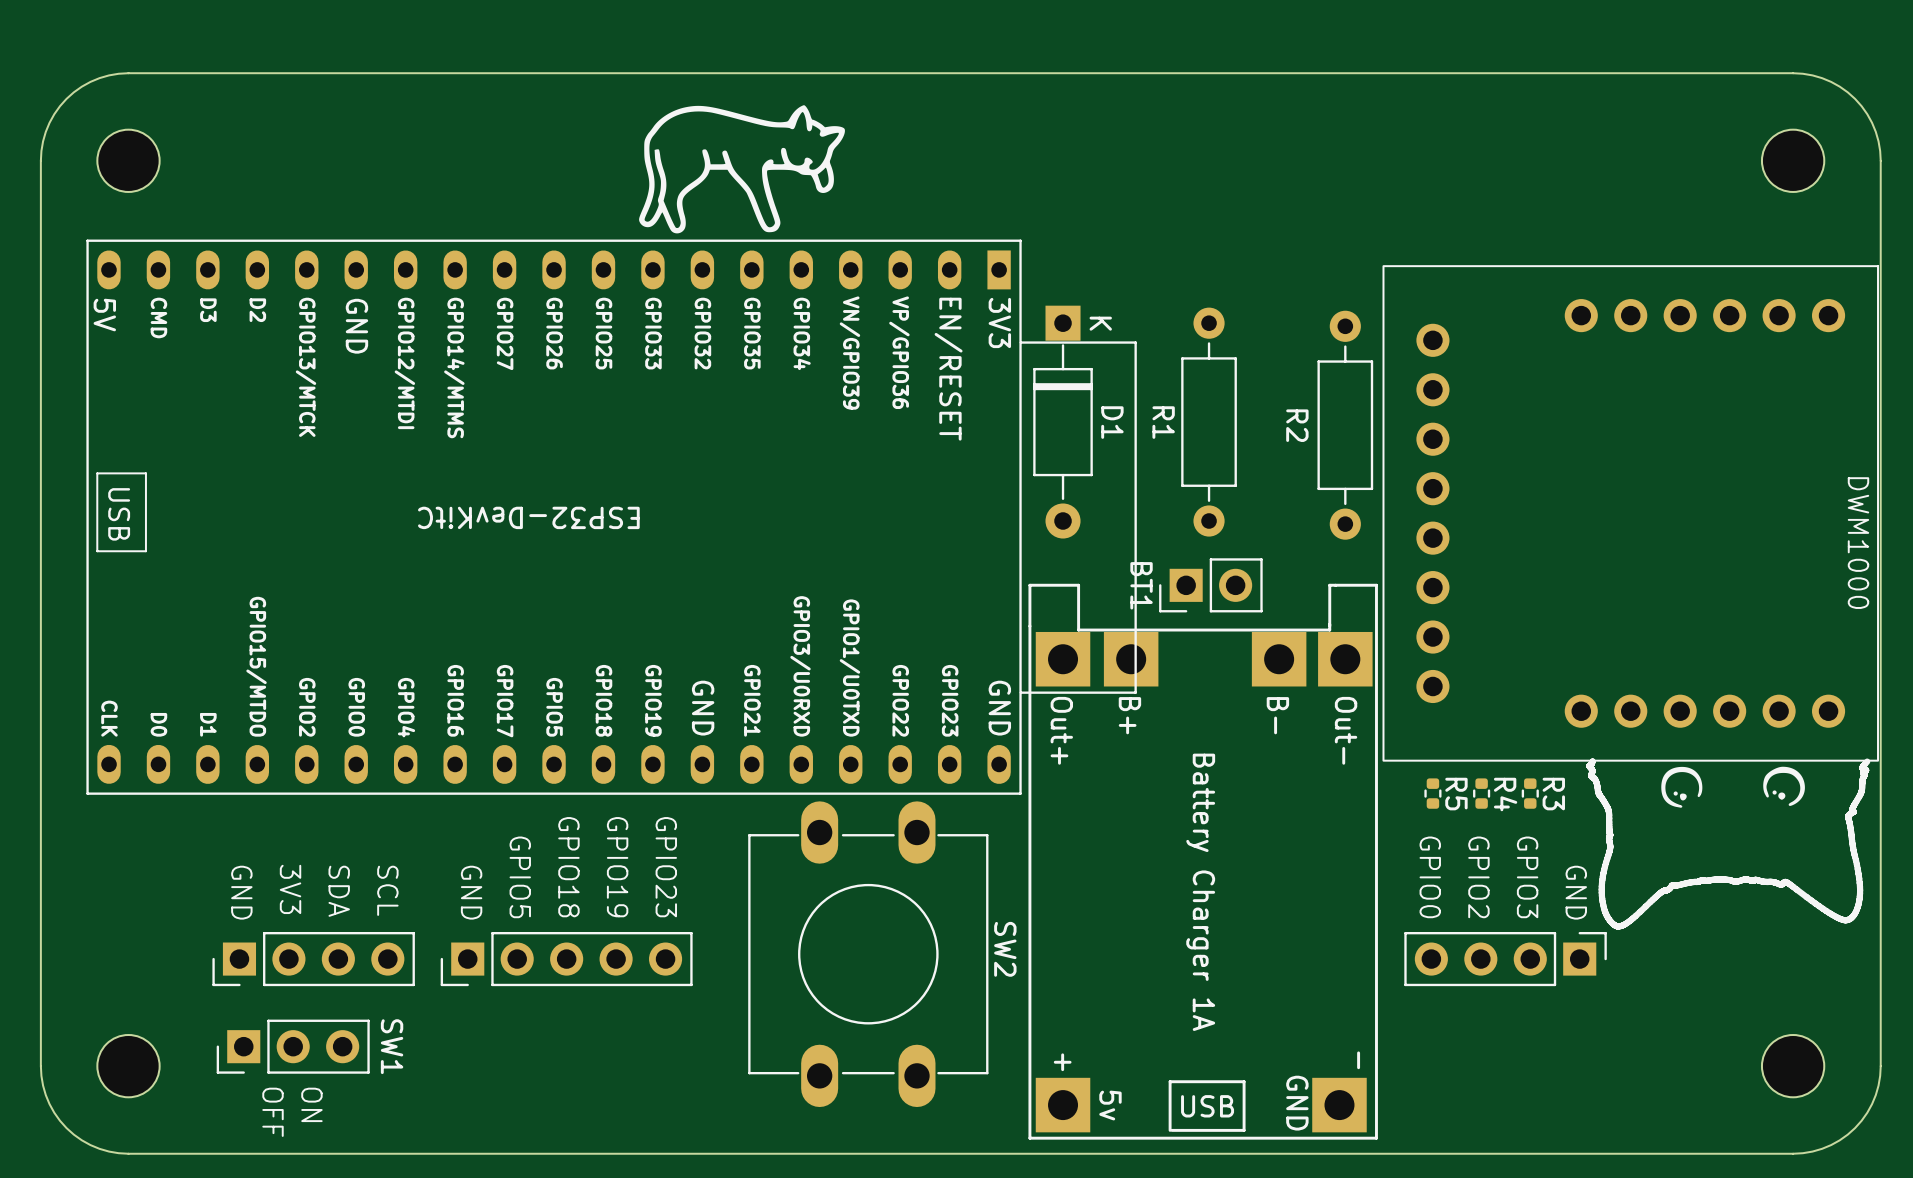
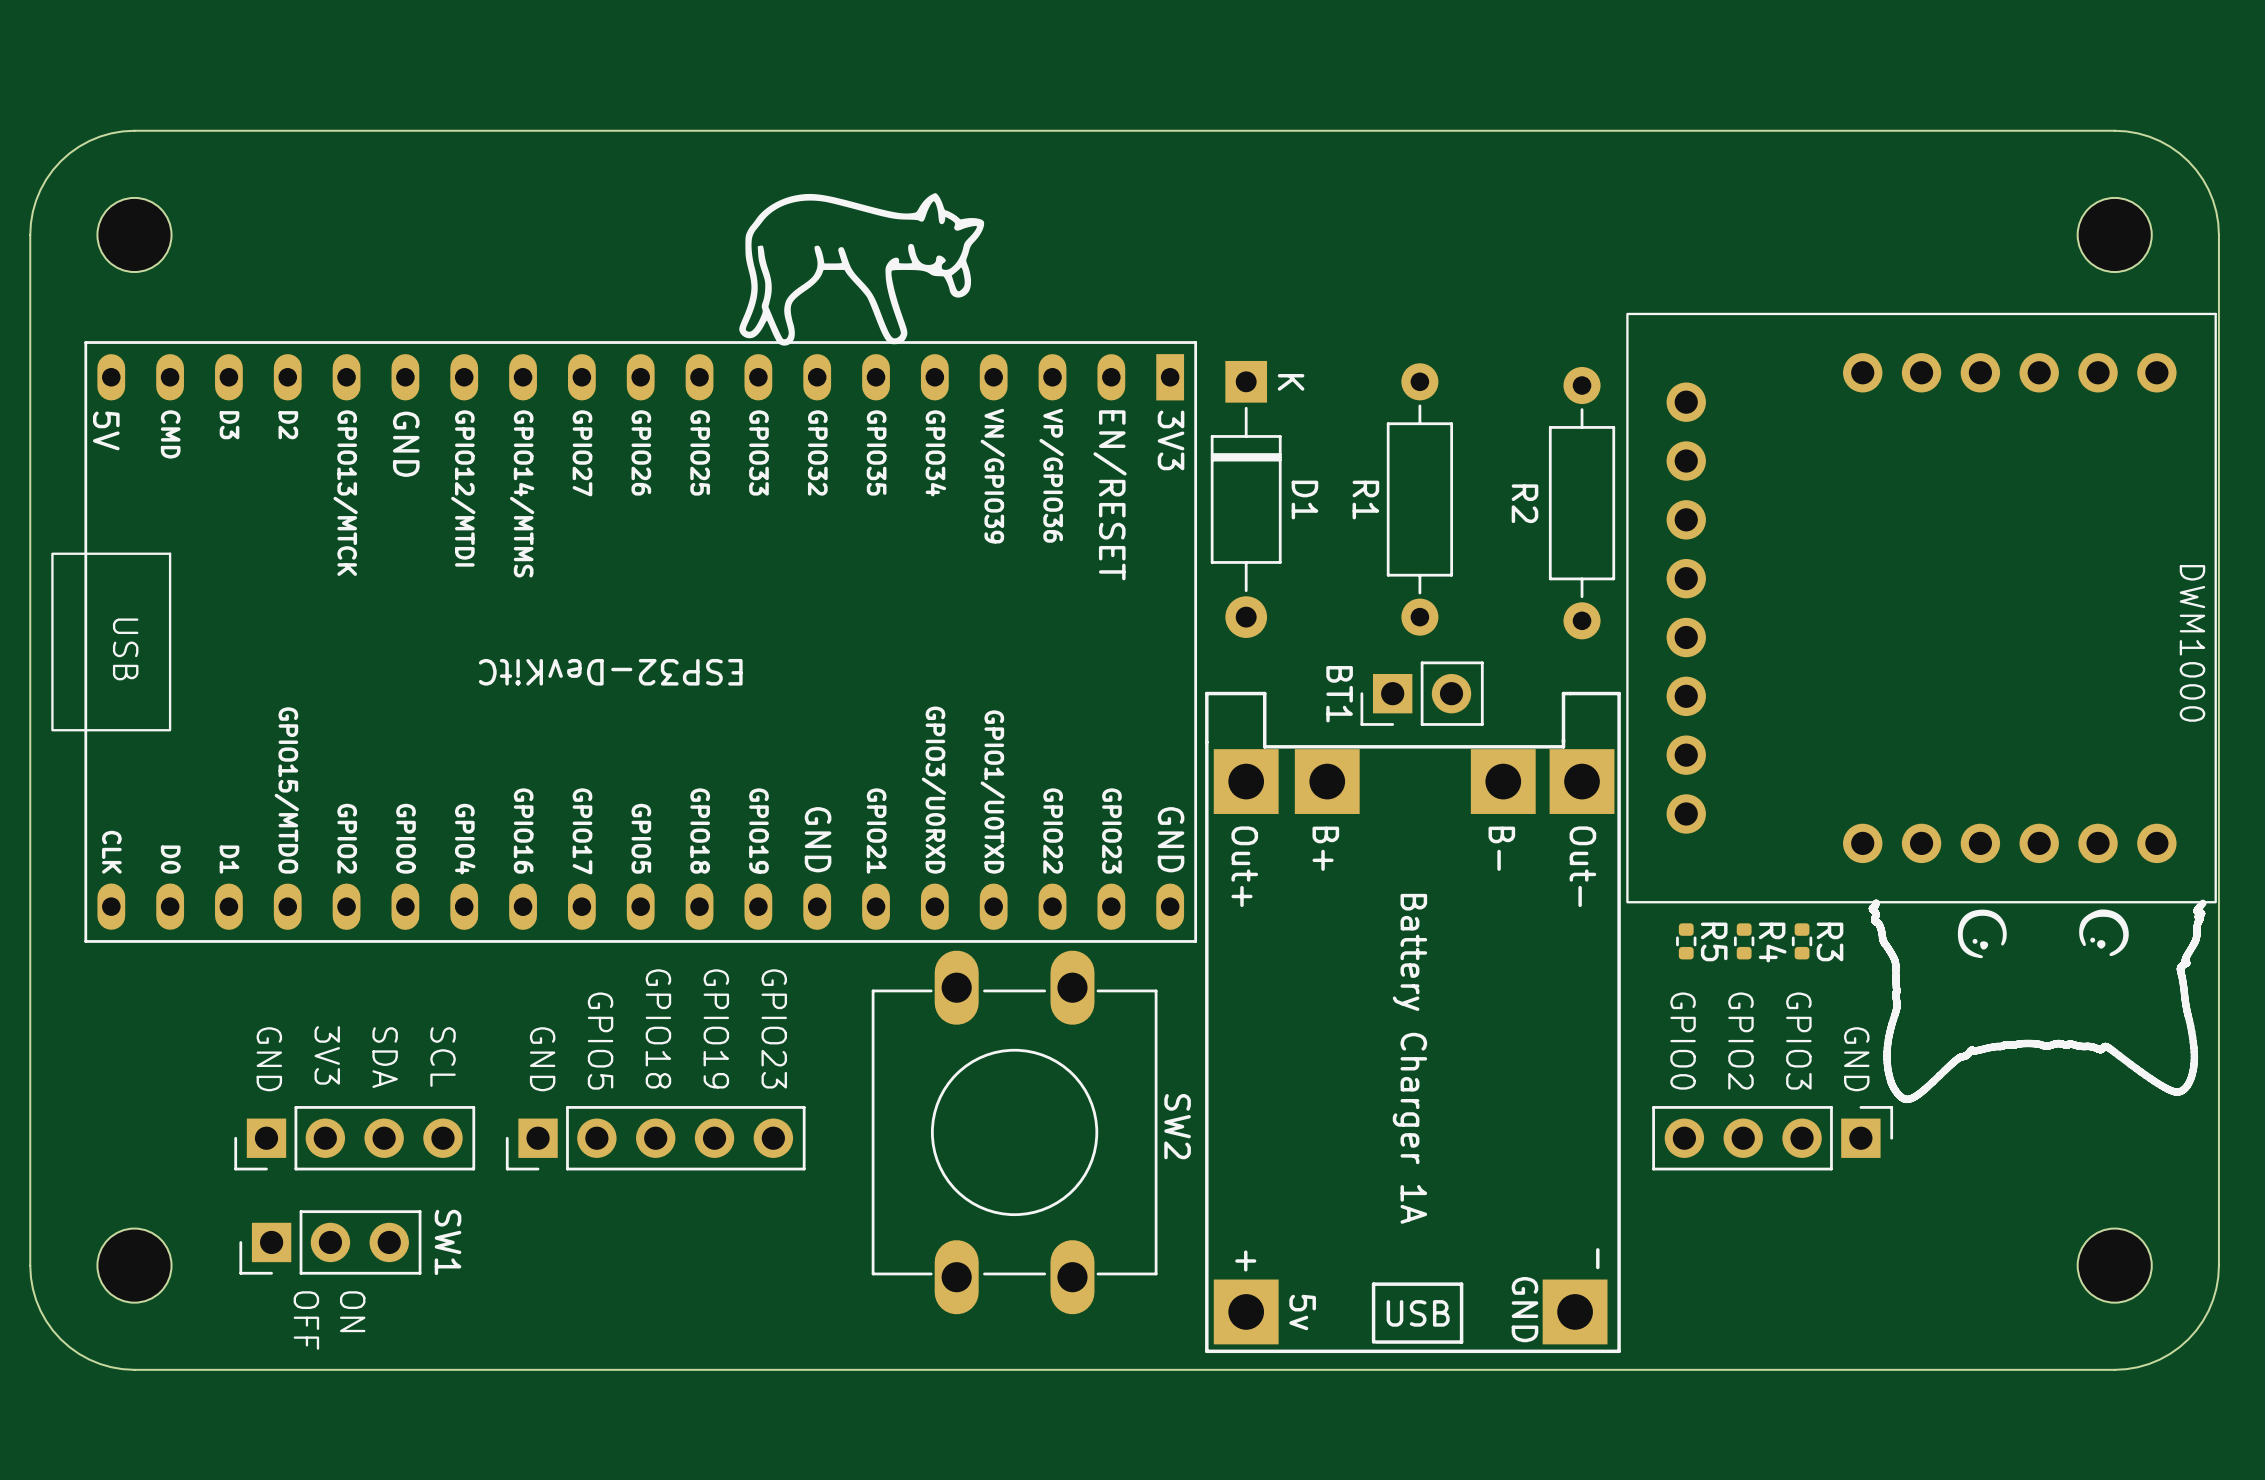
part position: (128, 160) -> (134, 234)
part position: (1793, 160) -> (2114, 234)
drawing position: (742, 169) -> (861, 269)
board edge: (40, 199) (41, 151) (45, 131) (54, 114) (66, 98) (81, 86) (99, 78) (128, 73) (1802, 73) (1822, 78) (1839, 86) (1855, 98) (1867, 114) (1875, 131) (1880, 151) (1880, 199) -> (30, 234) (36, 200) (46, 179) (60, 161) (89, 141) (111, 133) (134, 130) (2114, 130) (2137, 133) (2159, 141) (2188, 161) (2202, 179) (2213, 200) (2218, 234)
line: (97, 473) (145, 473) (145, 551) (97, 551) (97, 473) -> none
text: USB (119, 514) -> none
part: ESP32-DevKitC (611, 517) -> none
part: none -> ESP32-DevKitC (624, 641)

